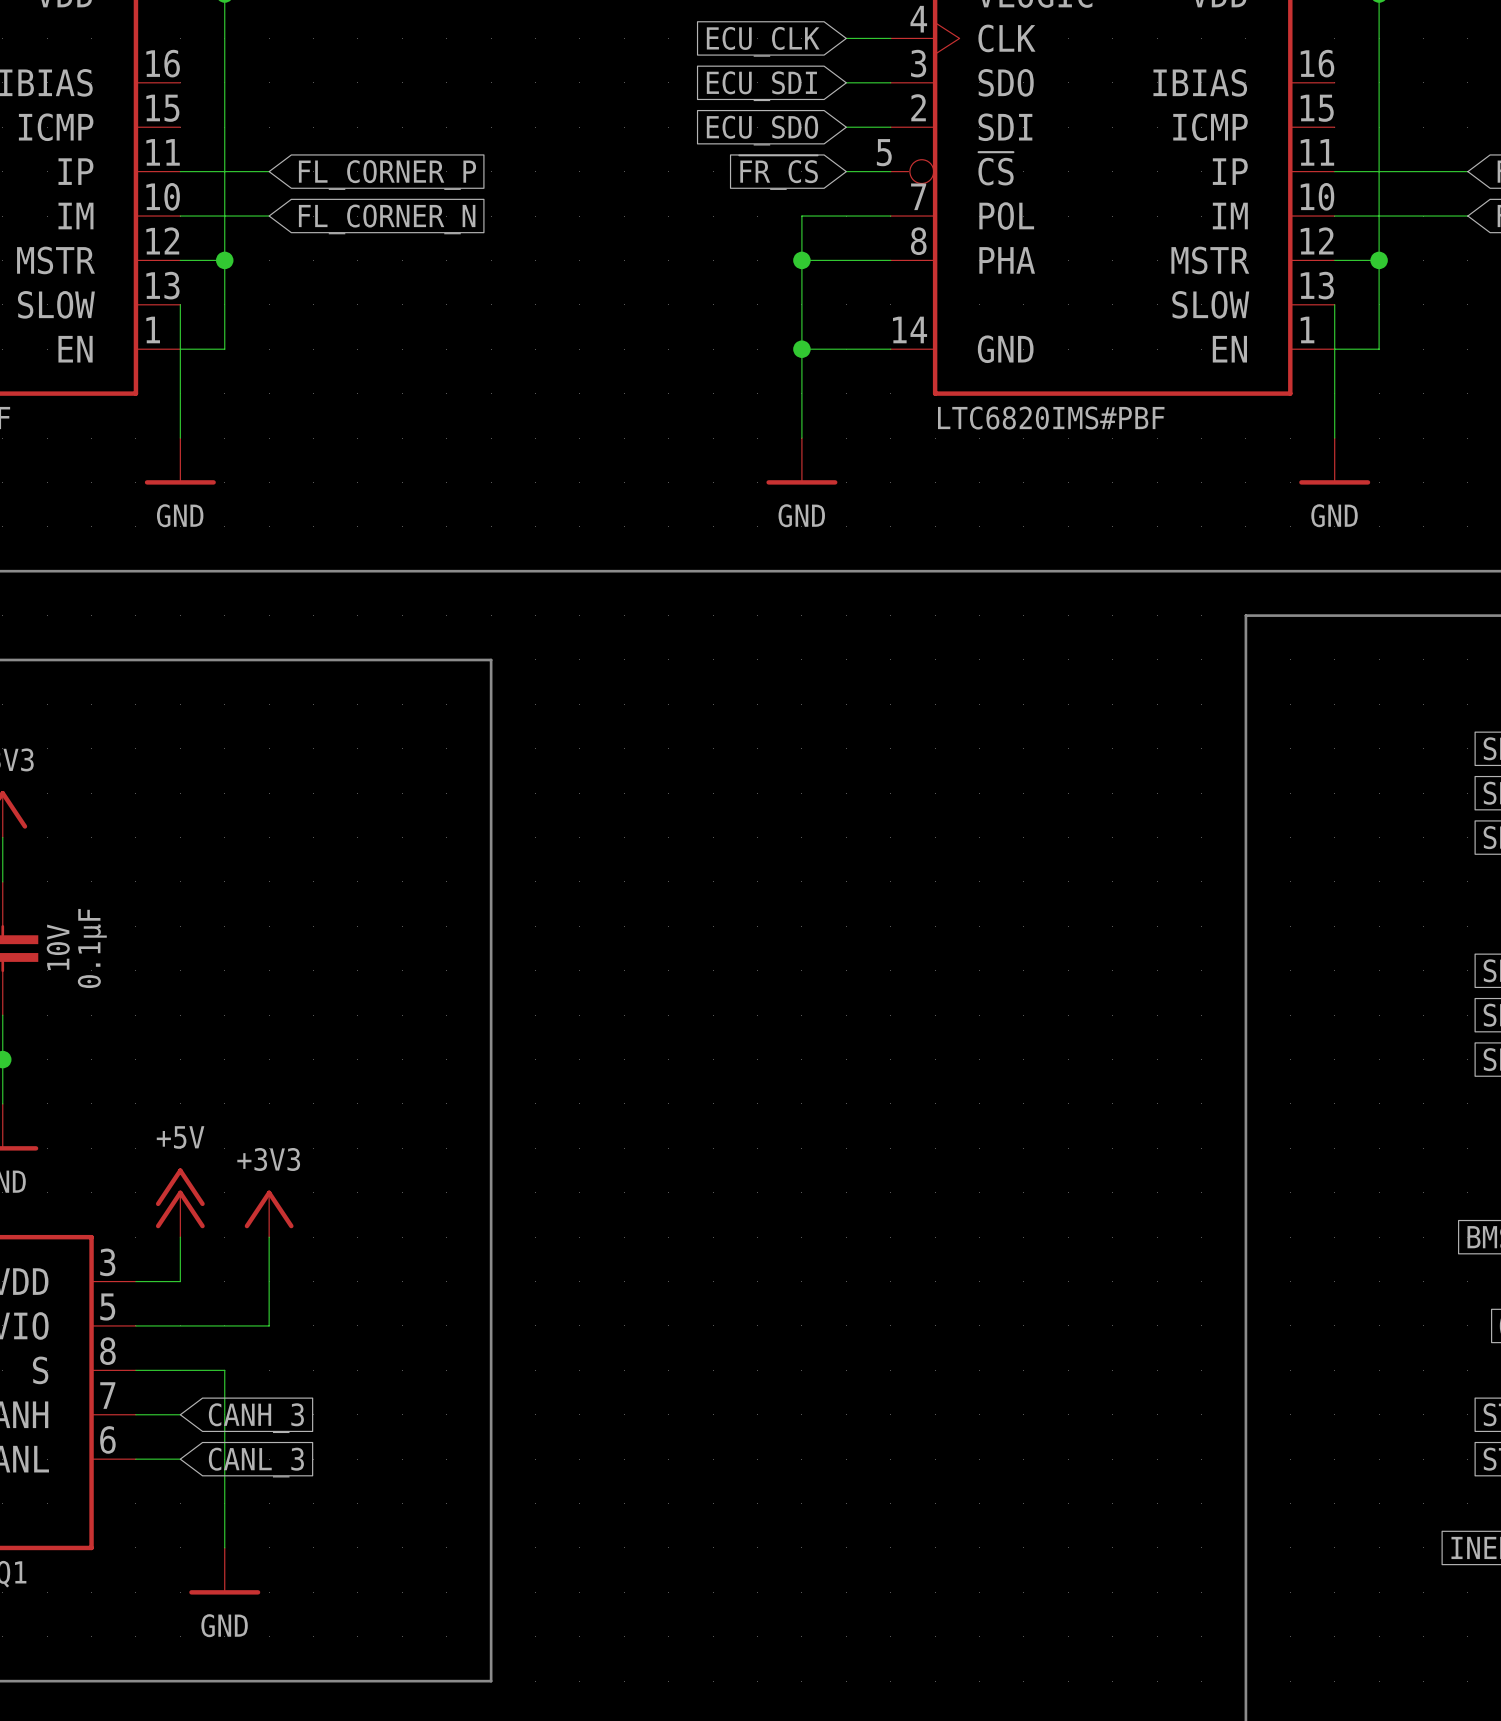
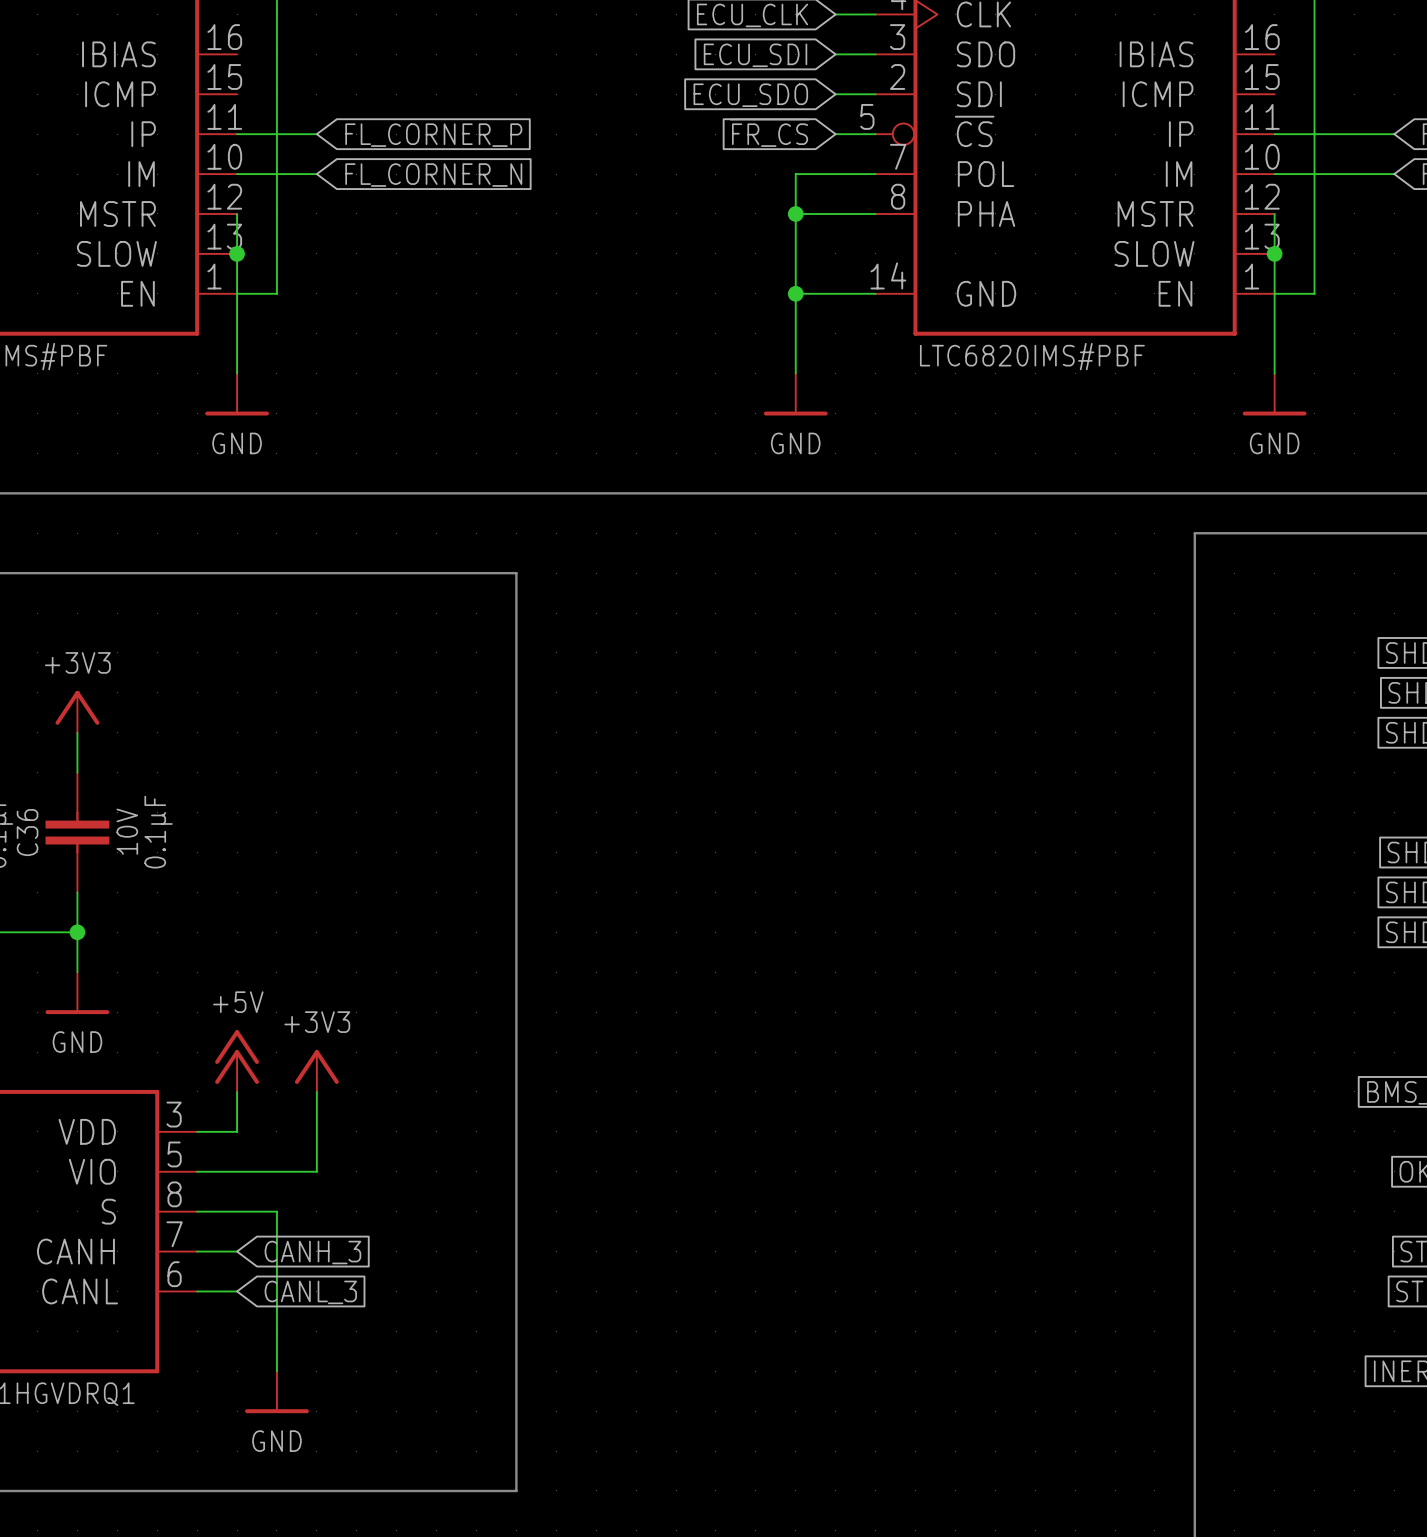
wire: (180, 260) (224, 260) -> (237, 213) (237, 253)
junction position: (224, 260) -> (237, 253)
wire: (1334, 260) (1379, 260) -> (1274, 213) (1274, 253)
junction position: (1379, 260) -> (1274, 253)

